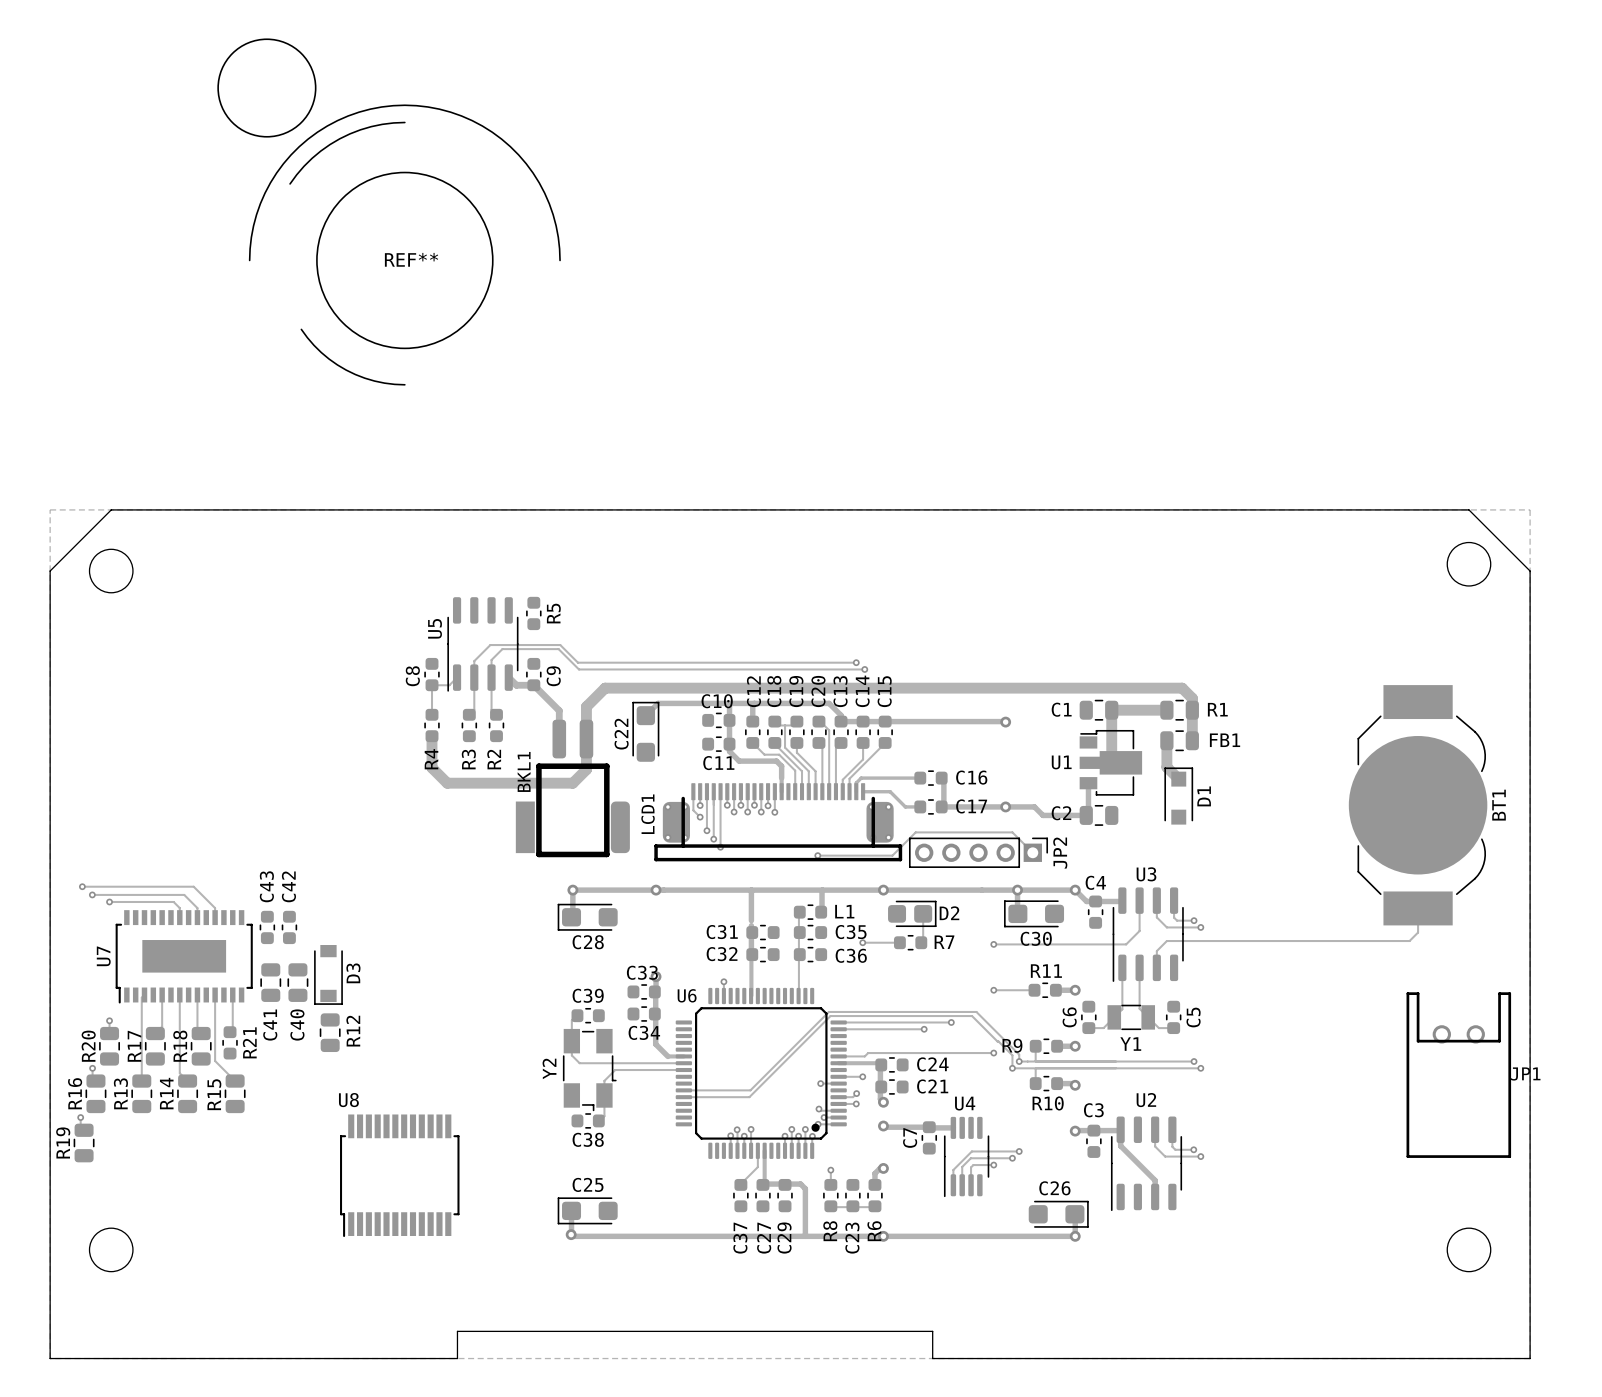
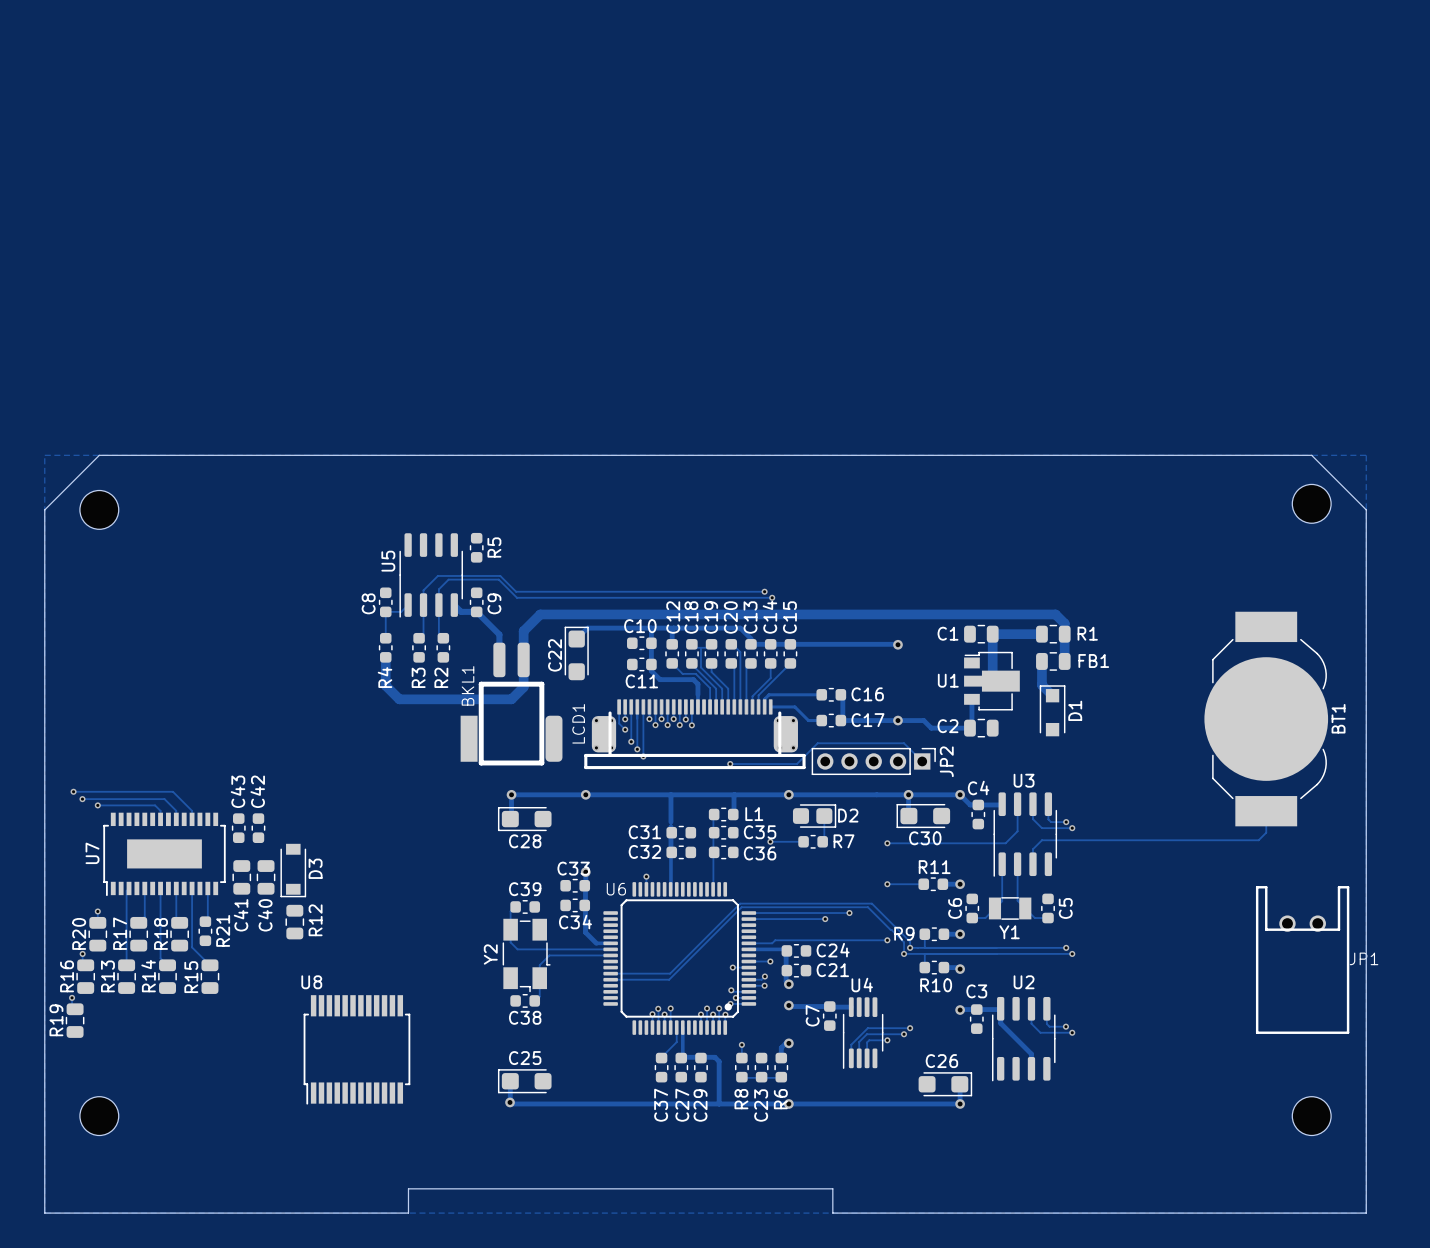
REF**: (389, 212) -> none

